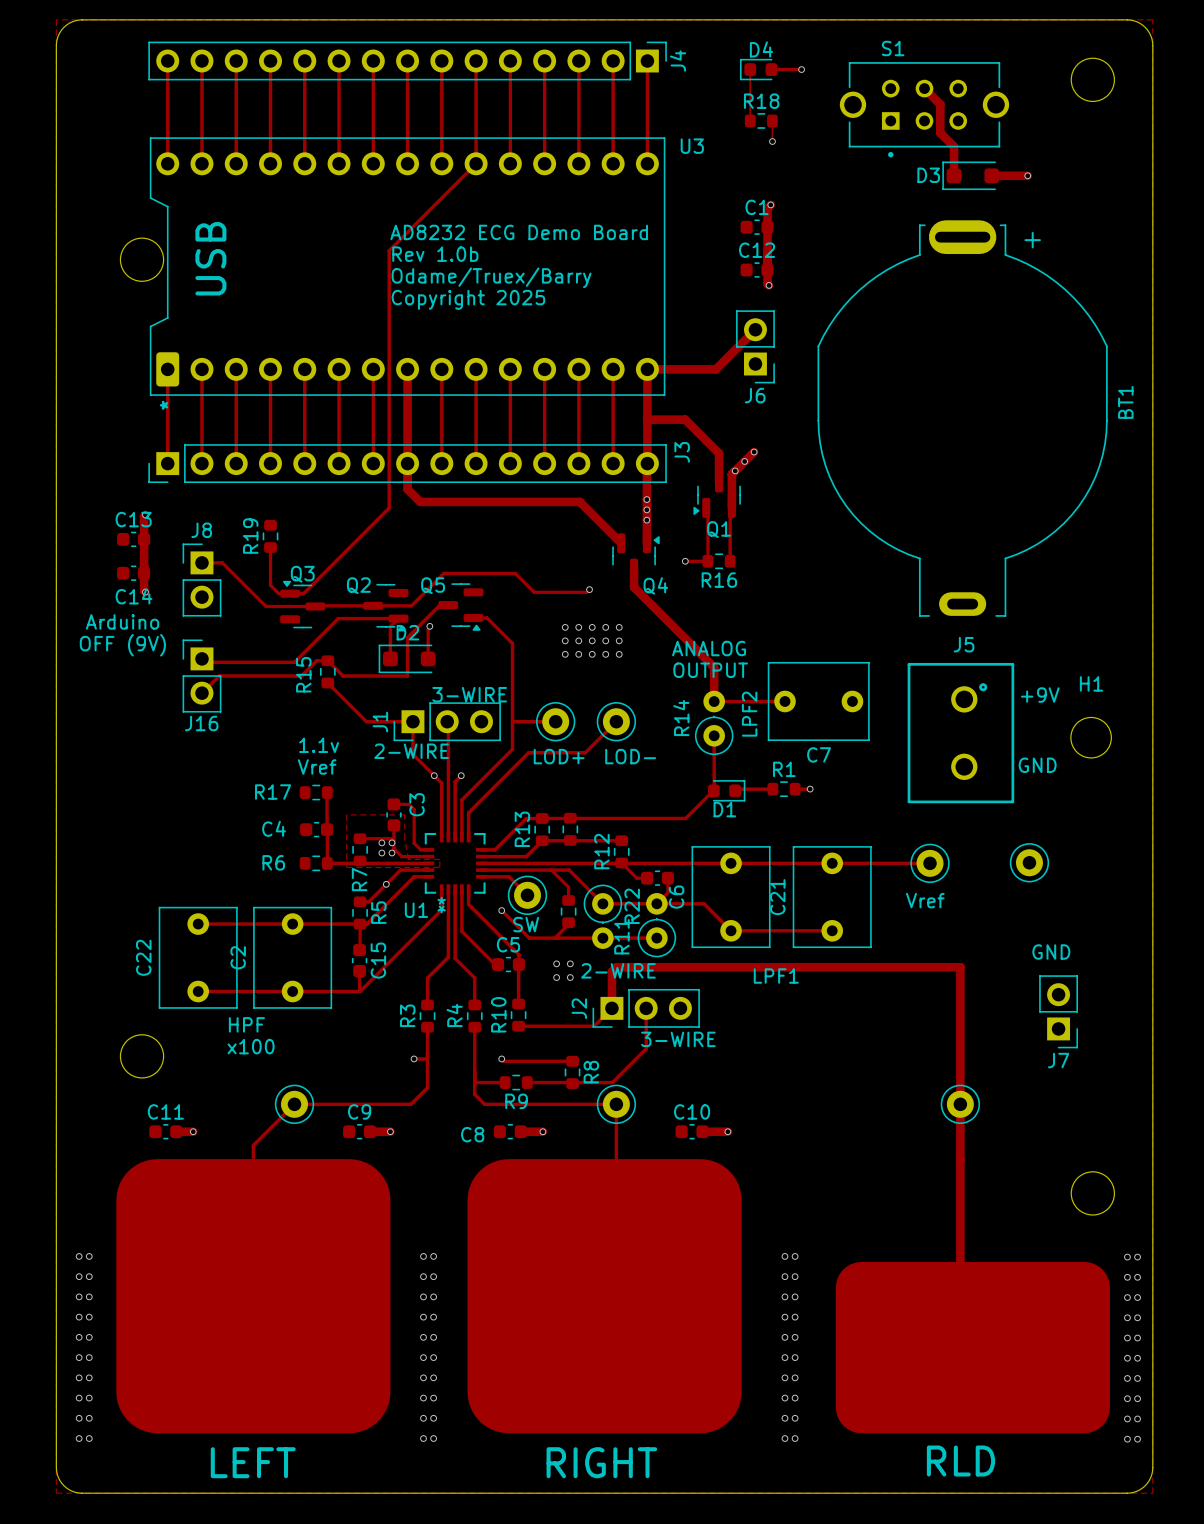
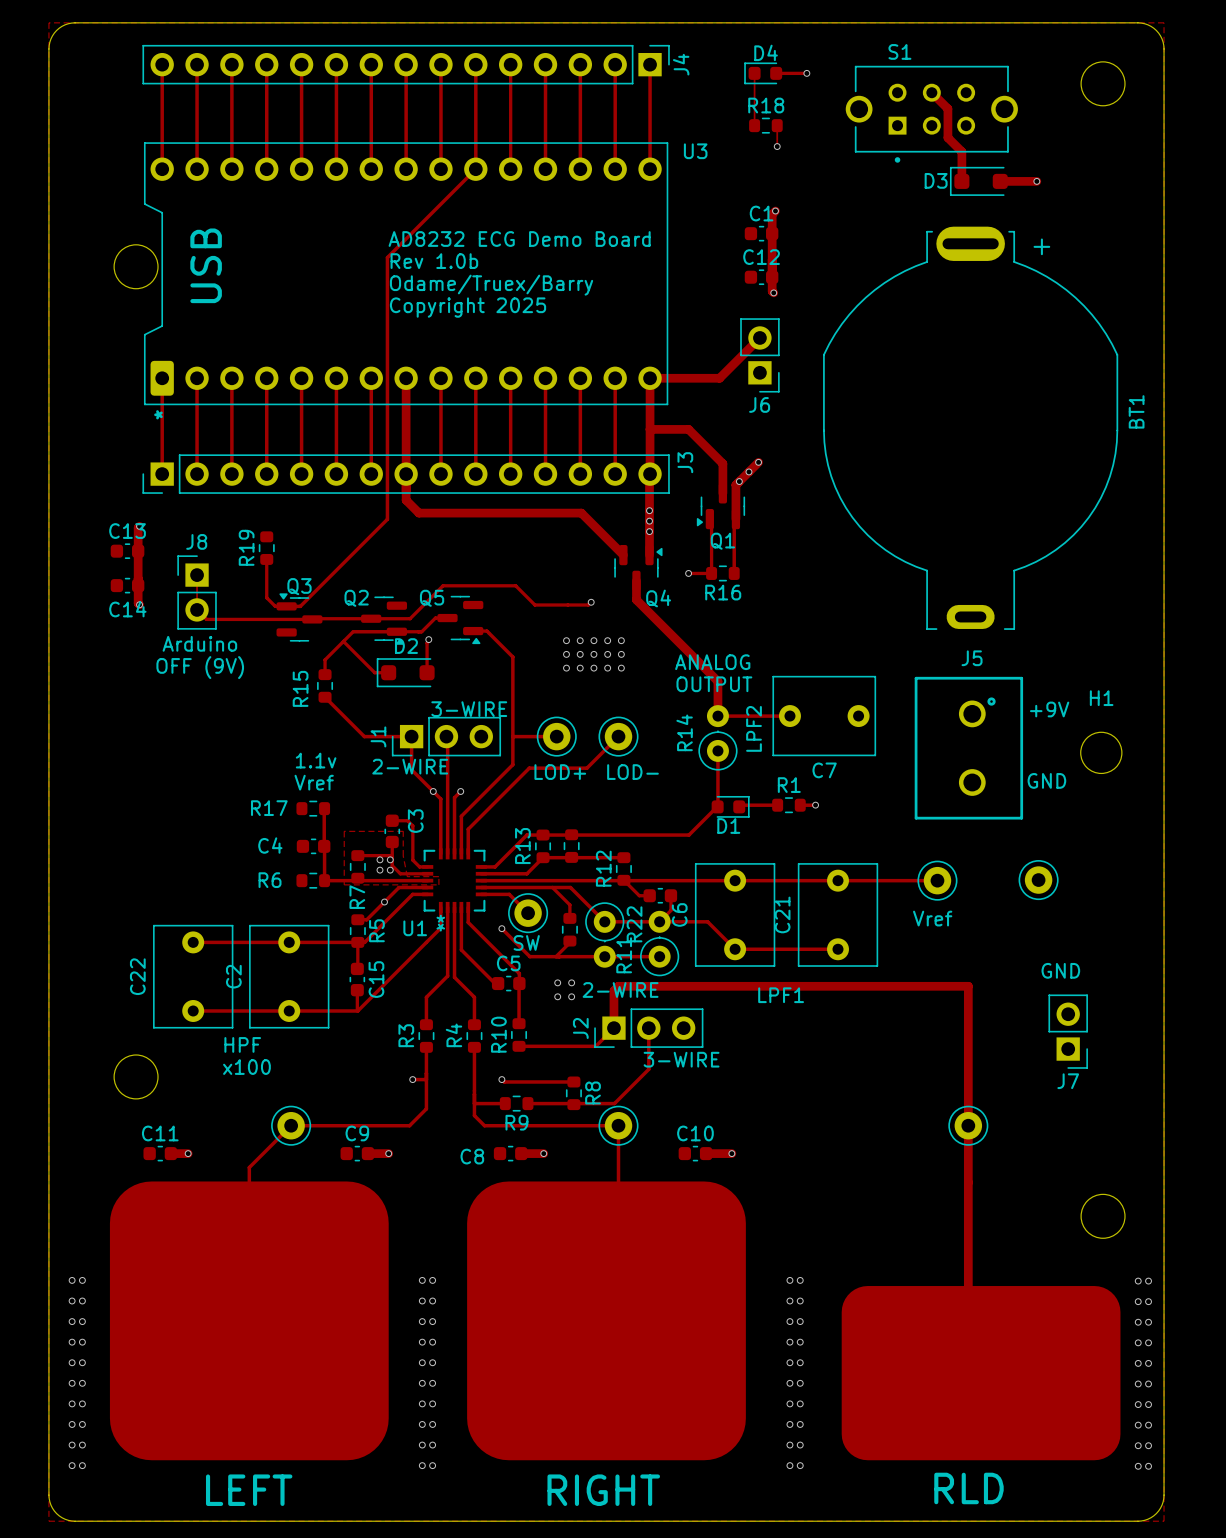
track: (201, 562) (222, 562) (266, 606) -> (197, 575) (197, 609) (206, 619) (262, 619)
track: (440, 605) (407, 637) (407, 676) (343, 676) (327, 660) (316, 660) (301, 676) (219, 676) (201, 693) -> (439, 618) (435, 618) (421, 631) (396, 631)
track: (355, 618) (338, 618) (294, 662) (205, 662) (201, 658) -> (353, 631) (325, 659) (325, 674)
track: (398, 618) (390, 626) (390, 658) -> (343, 641) (374, 672) (388, 672)
text position: Arduino (122, 621) -> Arduino (199, 643)
text position: OFF (9V) (122, 645) -> OFF (9V) (200, 667)
J16: (201, 676) -> none

